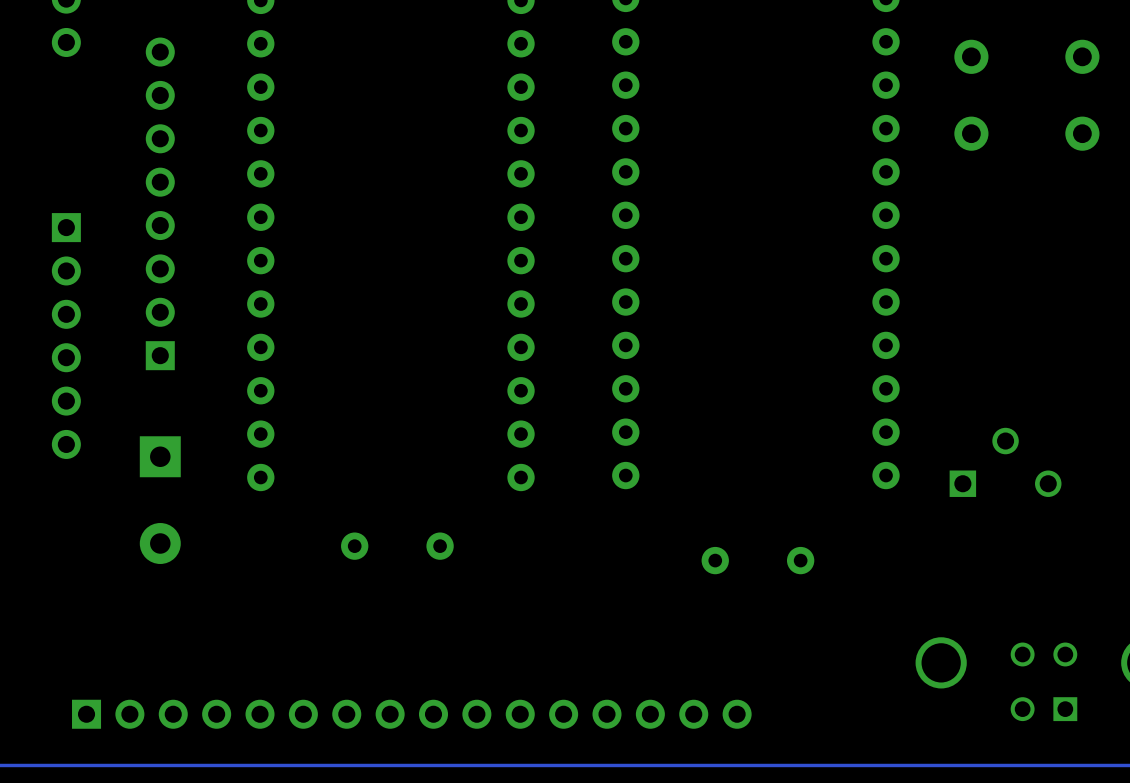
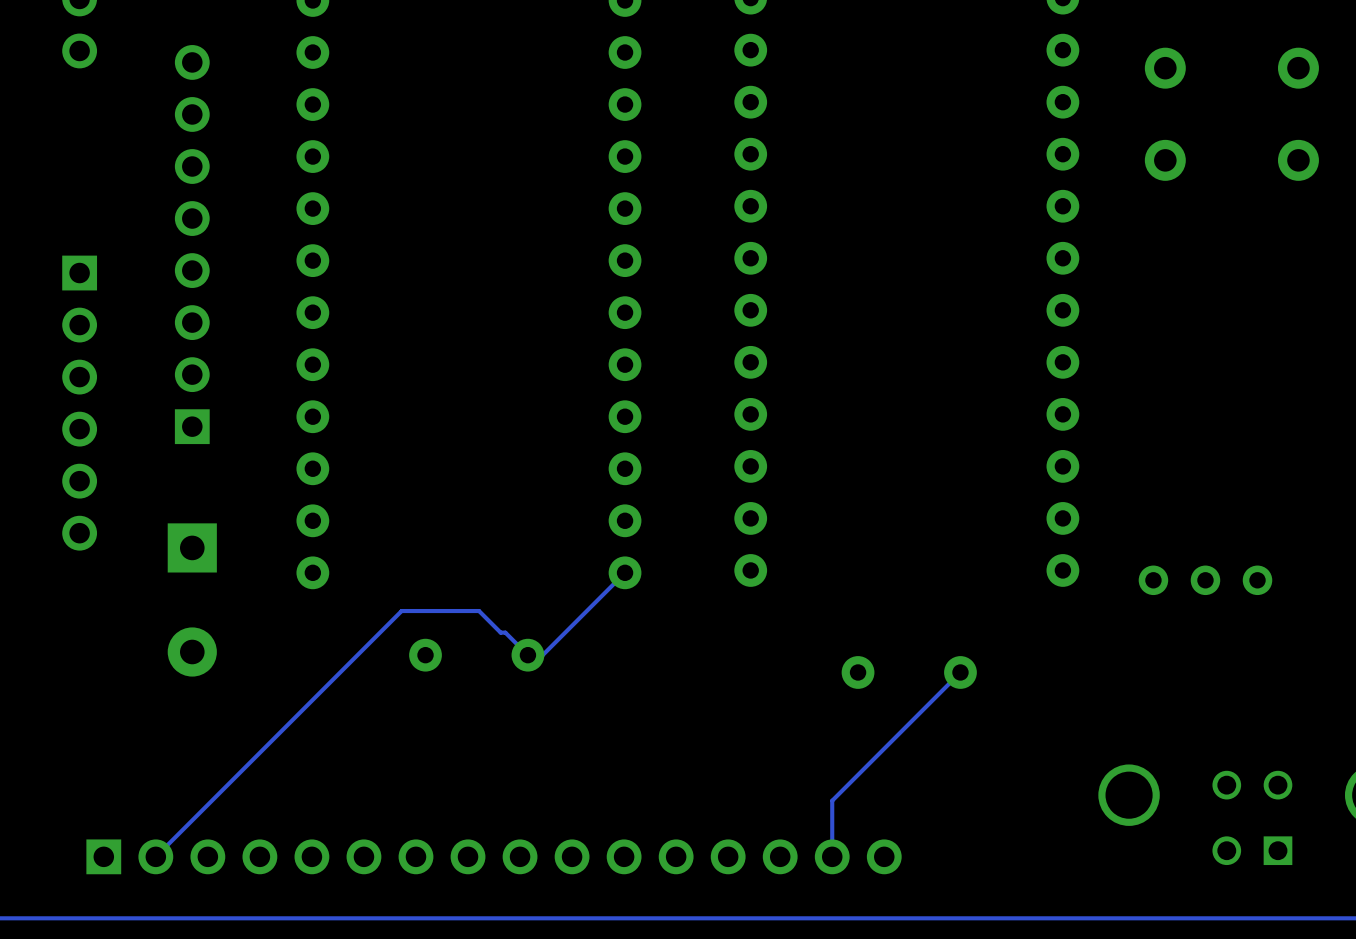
part: (1005, 462) -> none
track: none -> (625, 572) (542, 655) (527, 655) (505, 632) (500, 632) (479, 611) (401, 611) (155, 856)
part: none -> (1205, 580)
track: none -> (960, 672) (832, 800) (832, 856)

